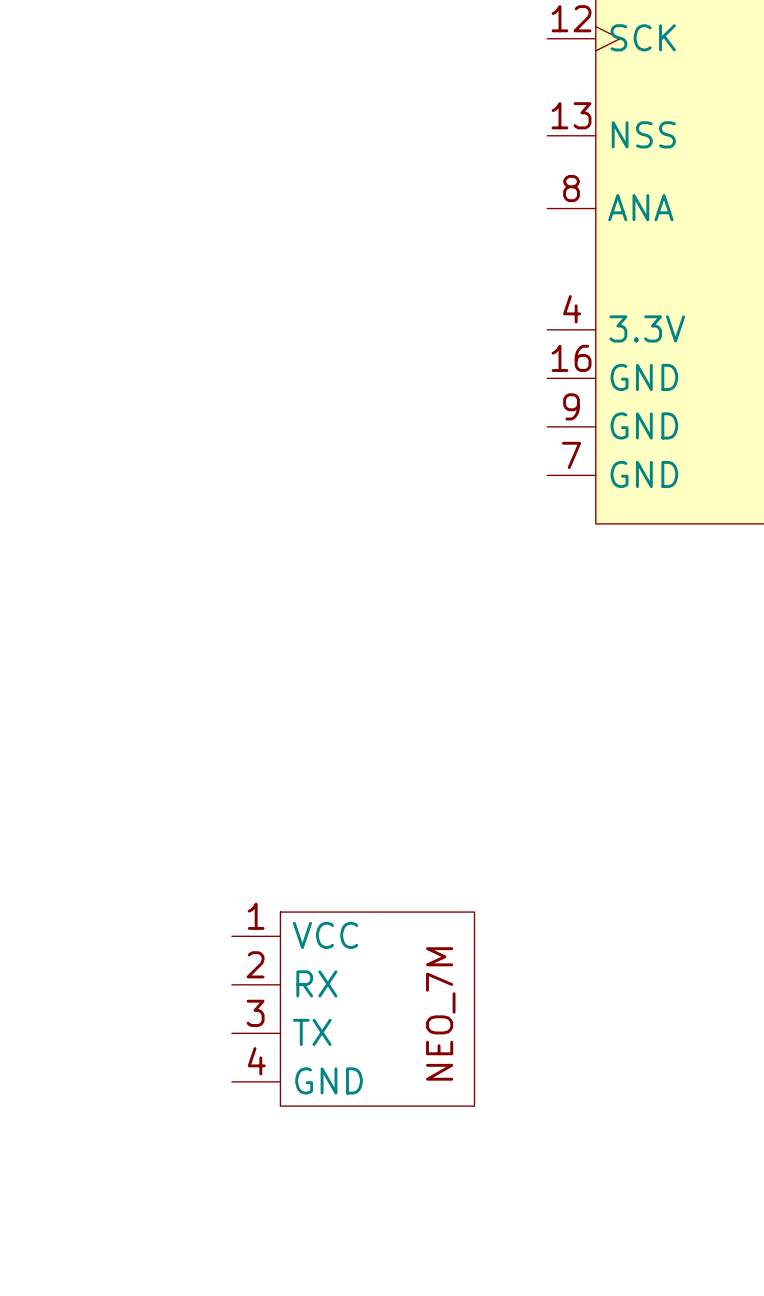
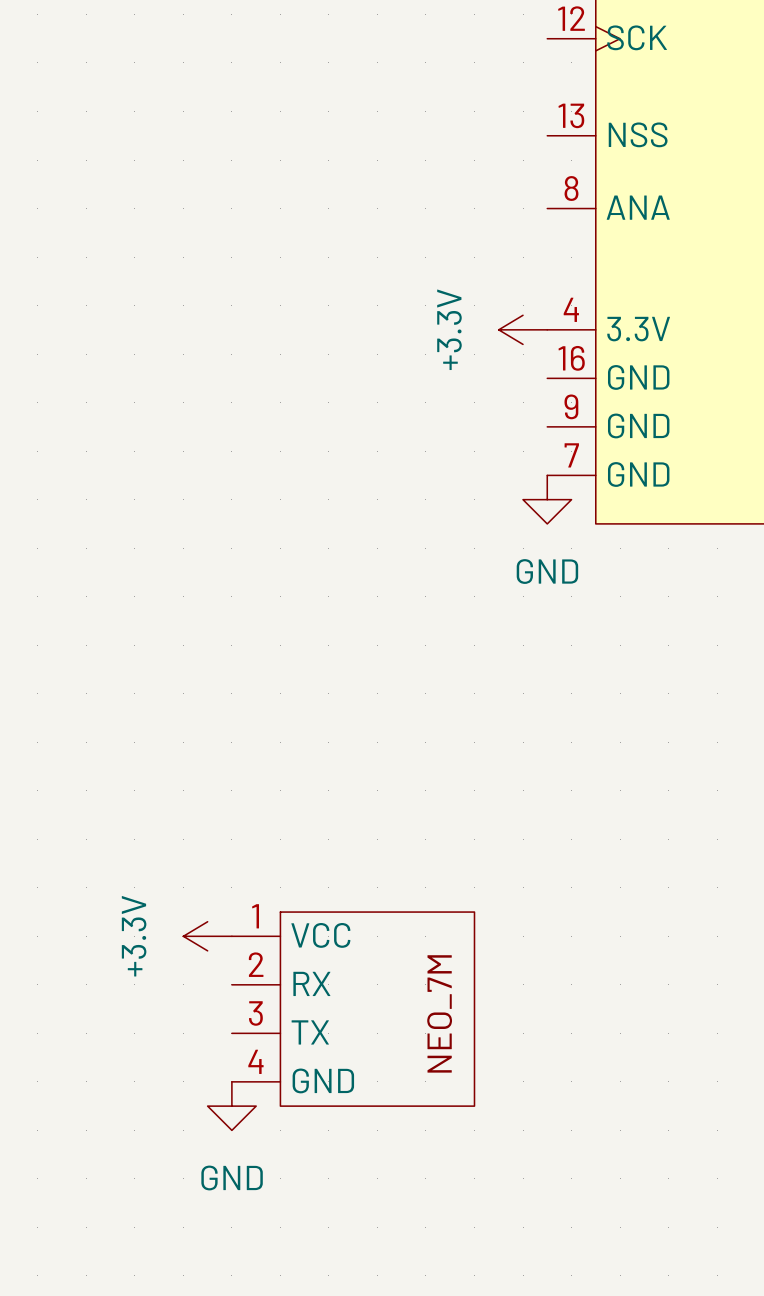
power symbol: none -> +3.3V (523, 329)
power symbol: none -> GND (547, 499)
power symbol: none -> +3.3V (207, 936)
power symbol: none -> GND (231, 1106)

